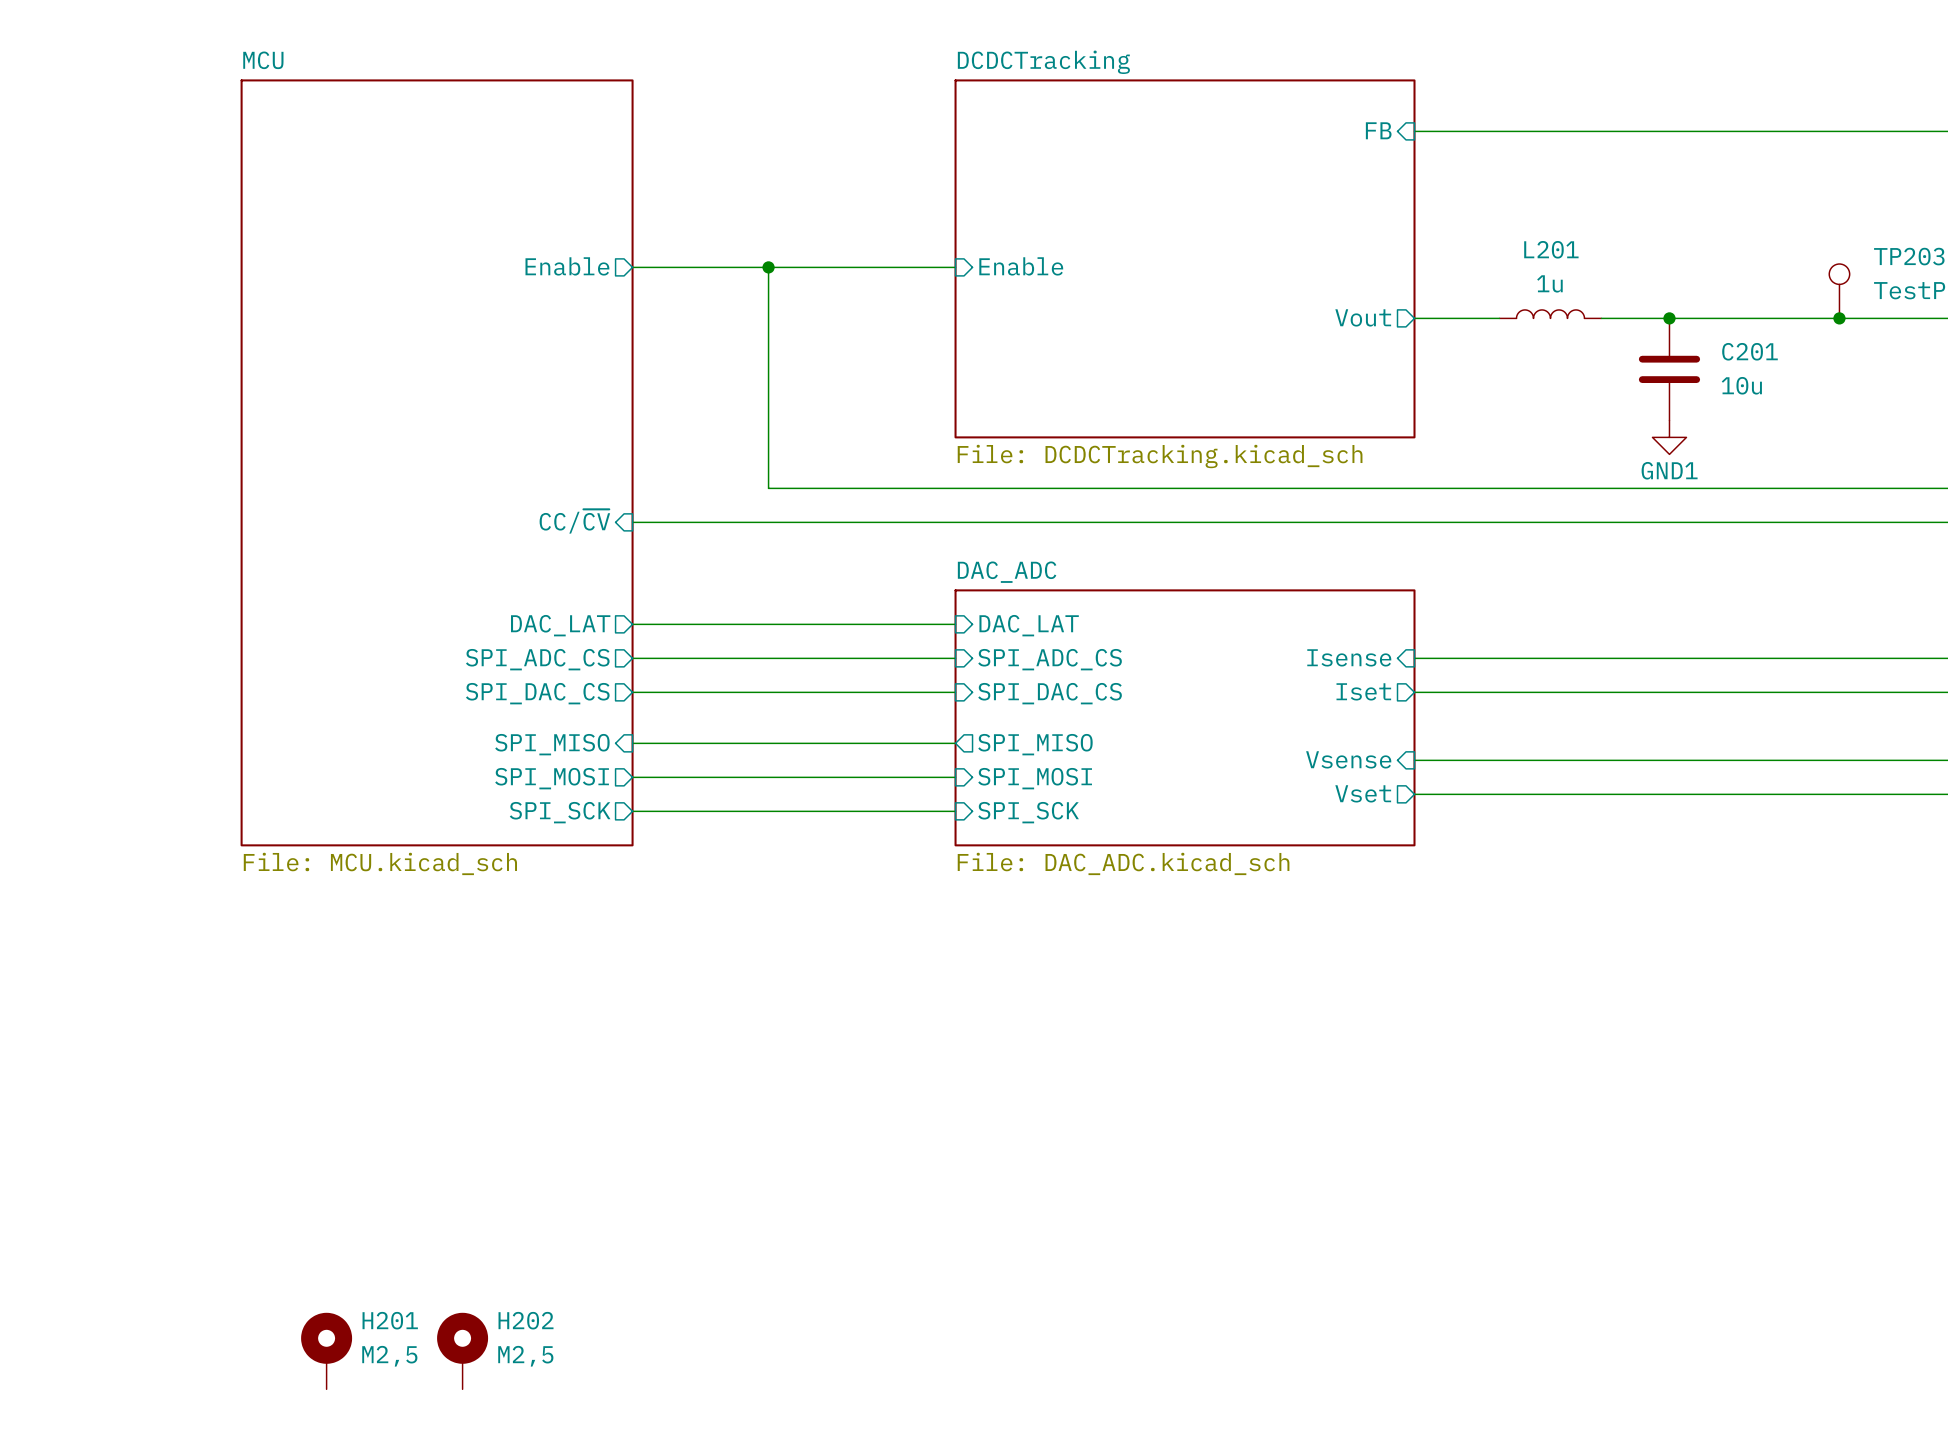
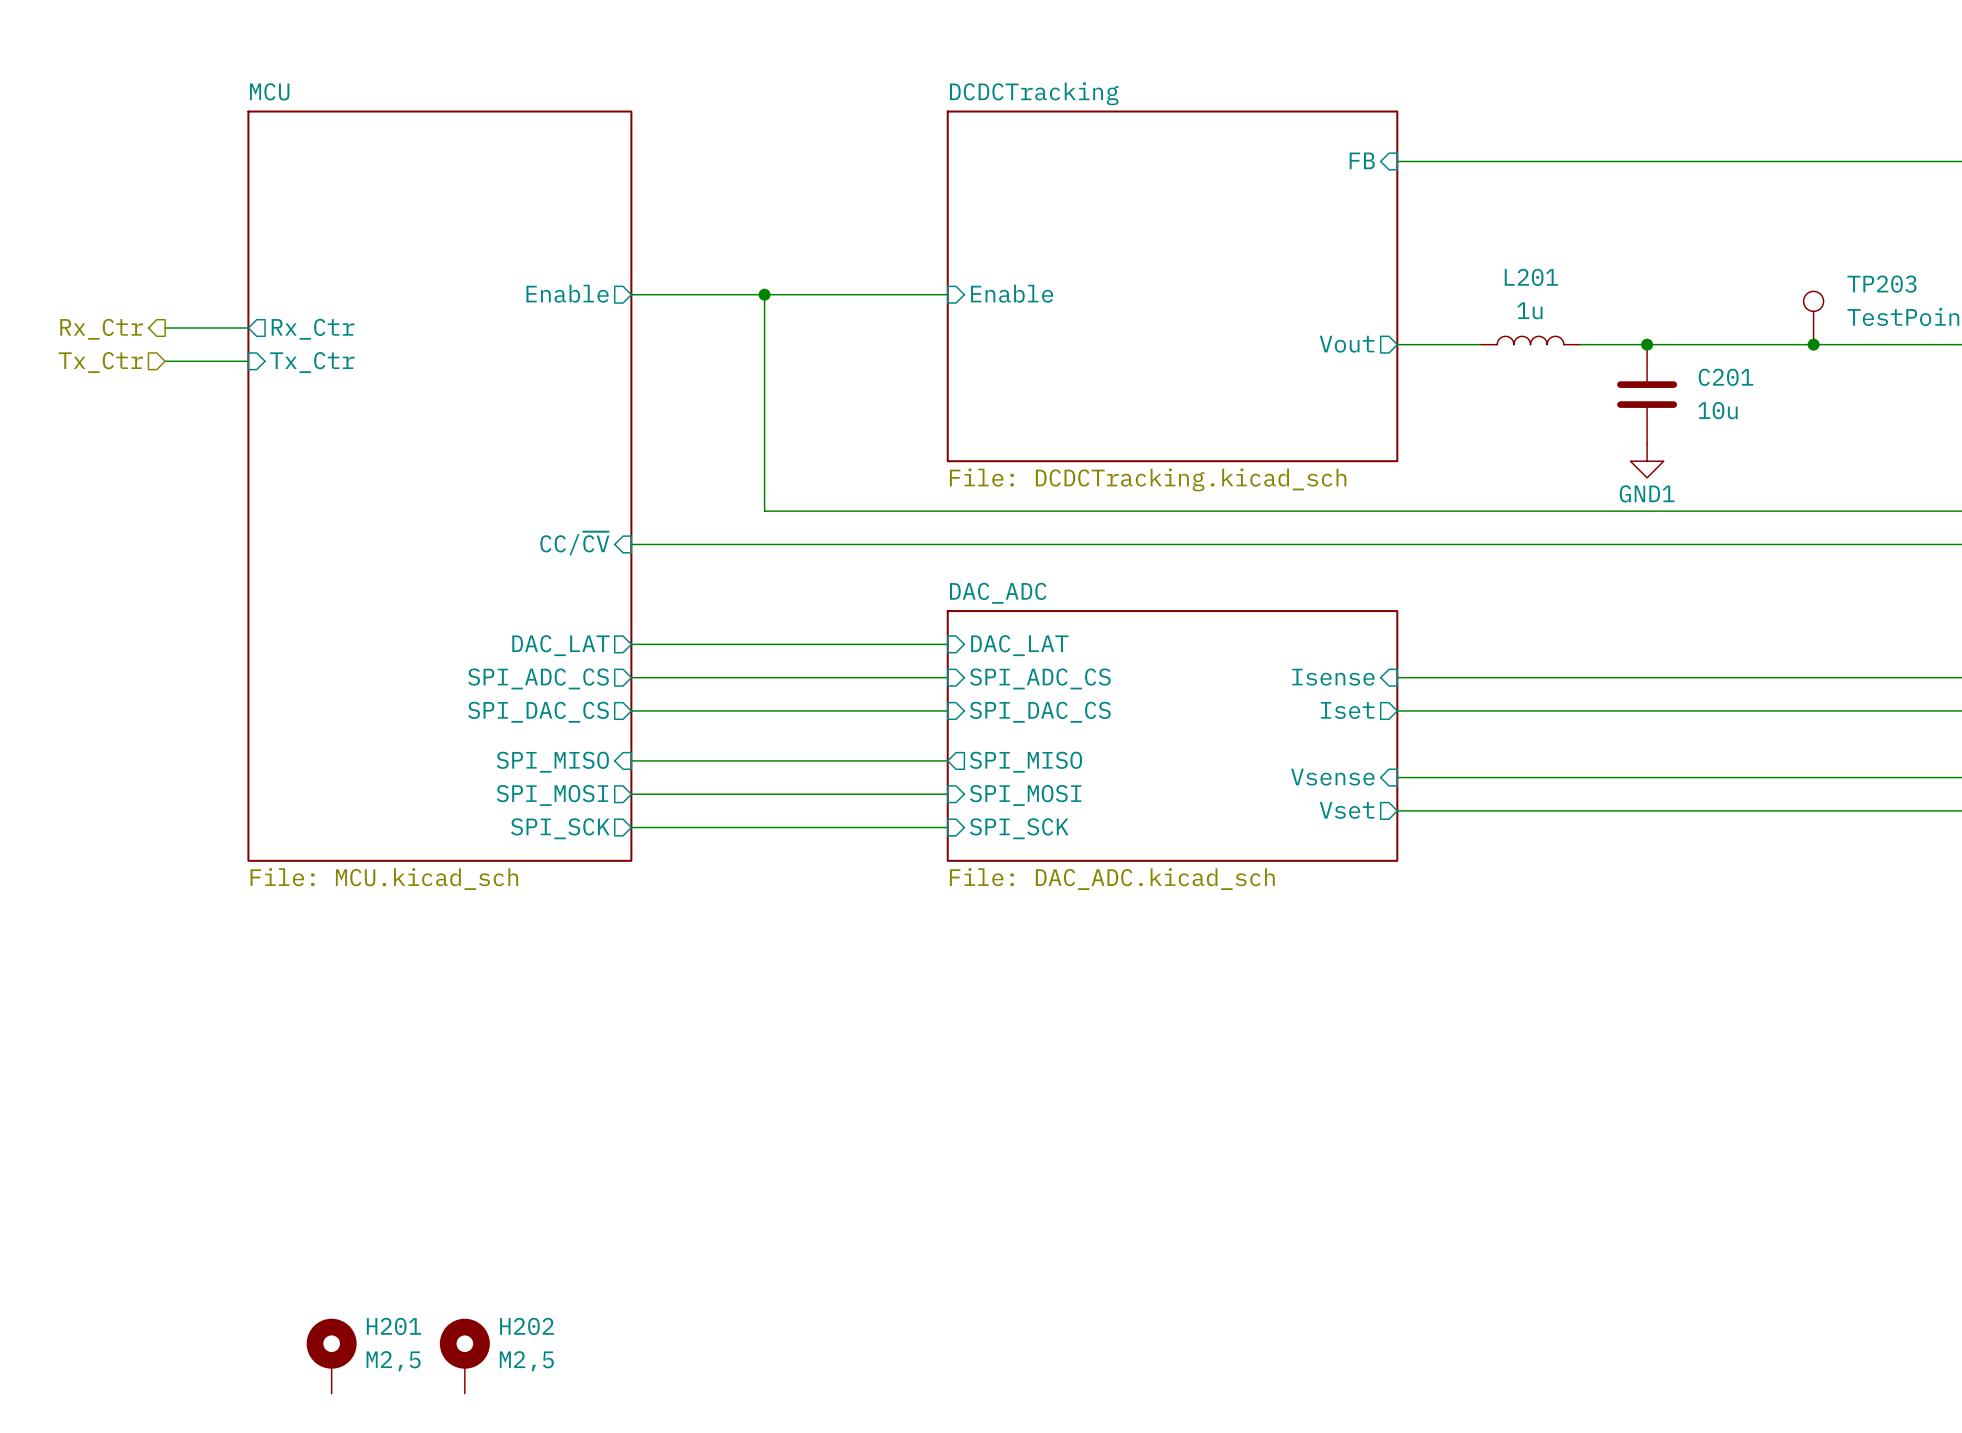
wire: none -> (165, 328) (248, 328)
hierarchical label: none -> Rx_Ctr (101, 329)
sheet pin: none -> Rx_Ctr (313, 329)
wire: none -> (165, 361) (248, 361)
hierarchical label: none -> Tx_Ctr (100, 362)
sheet pin: none -> Tx_Ctr (312, 362)

